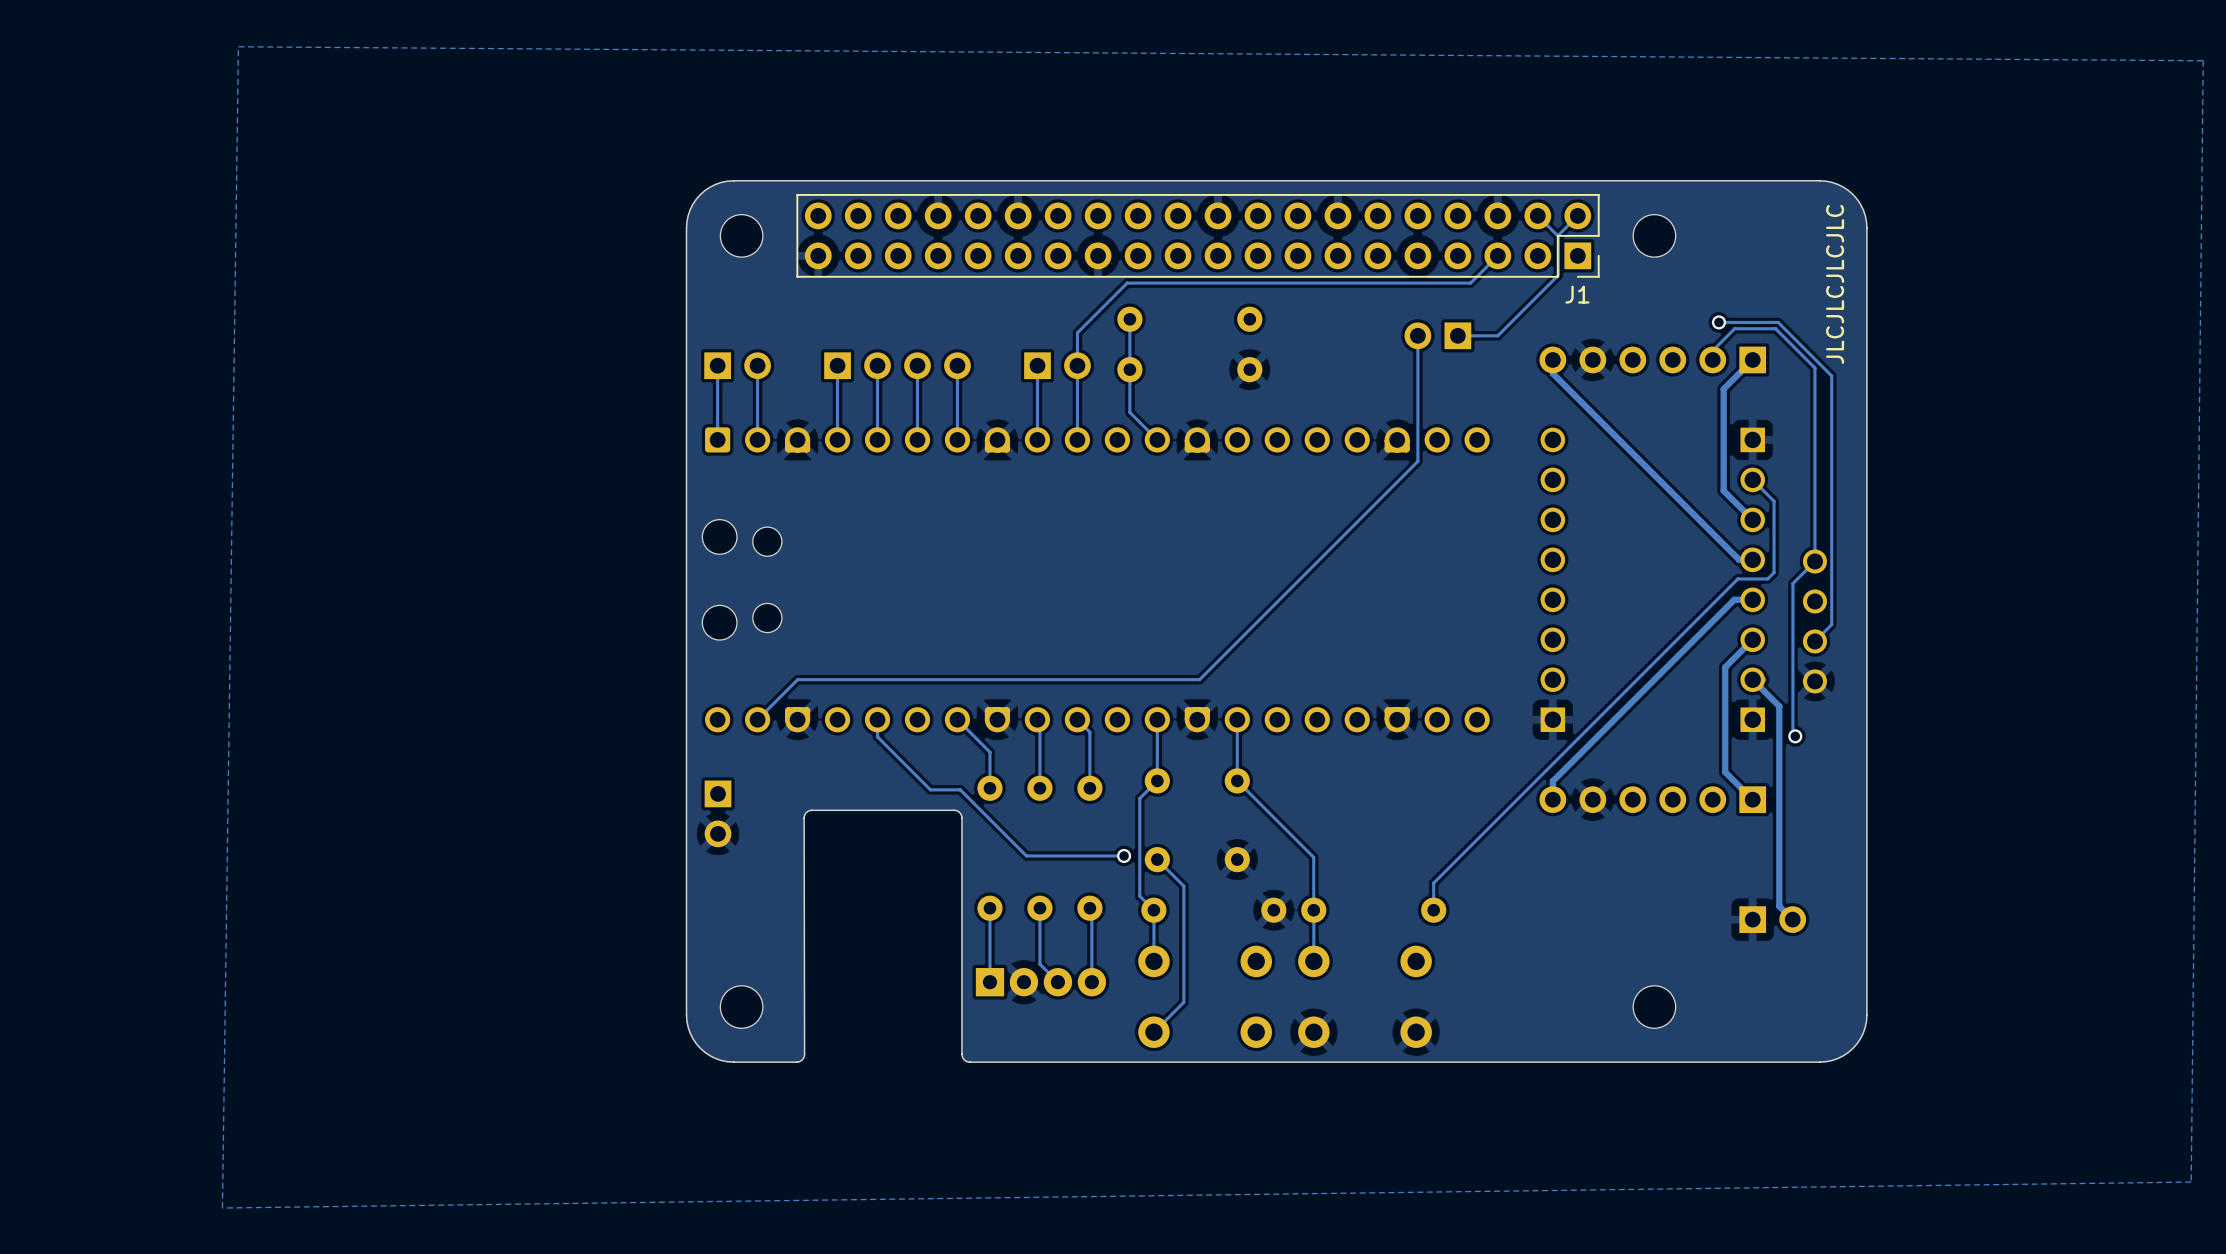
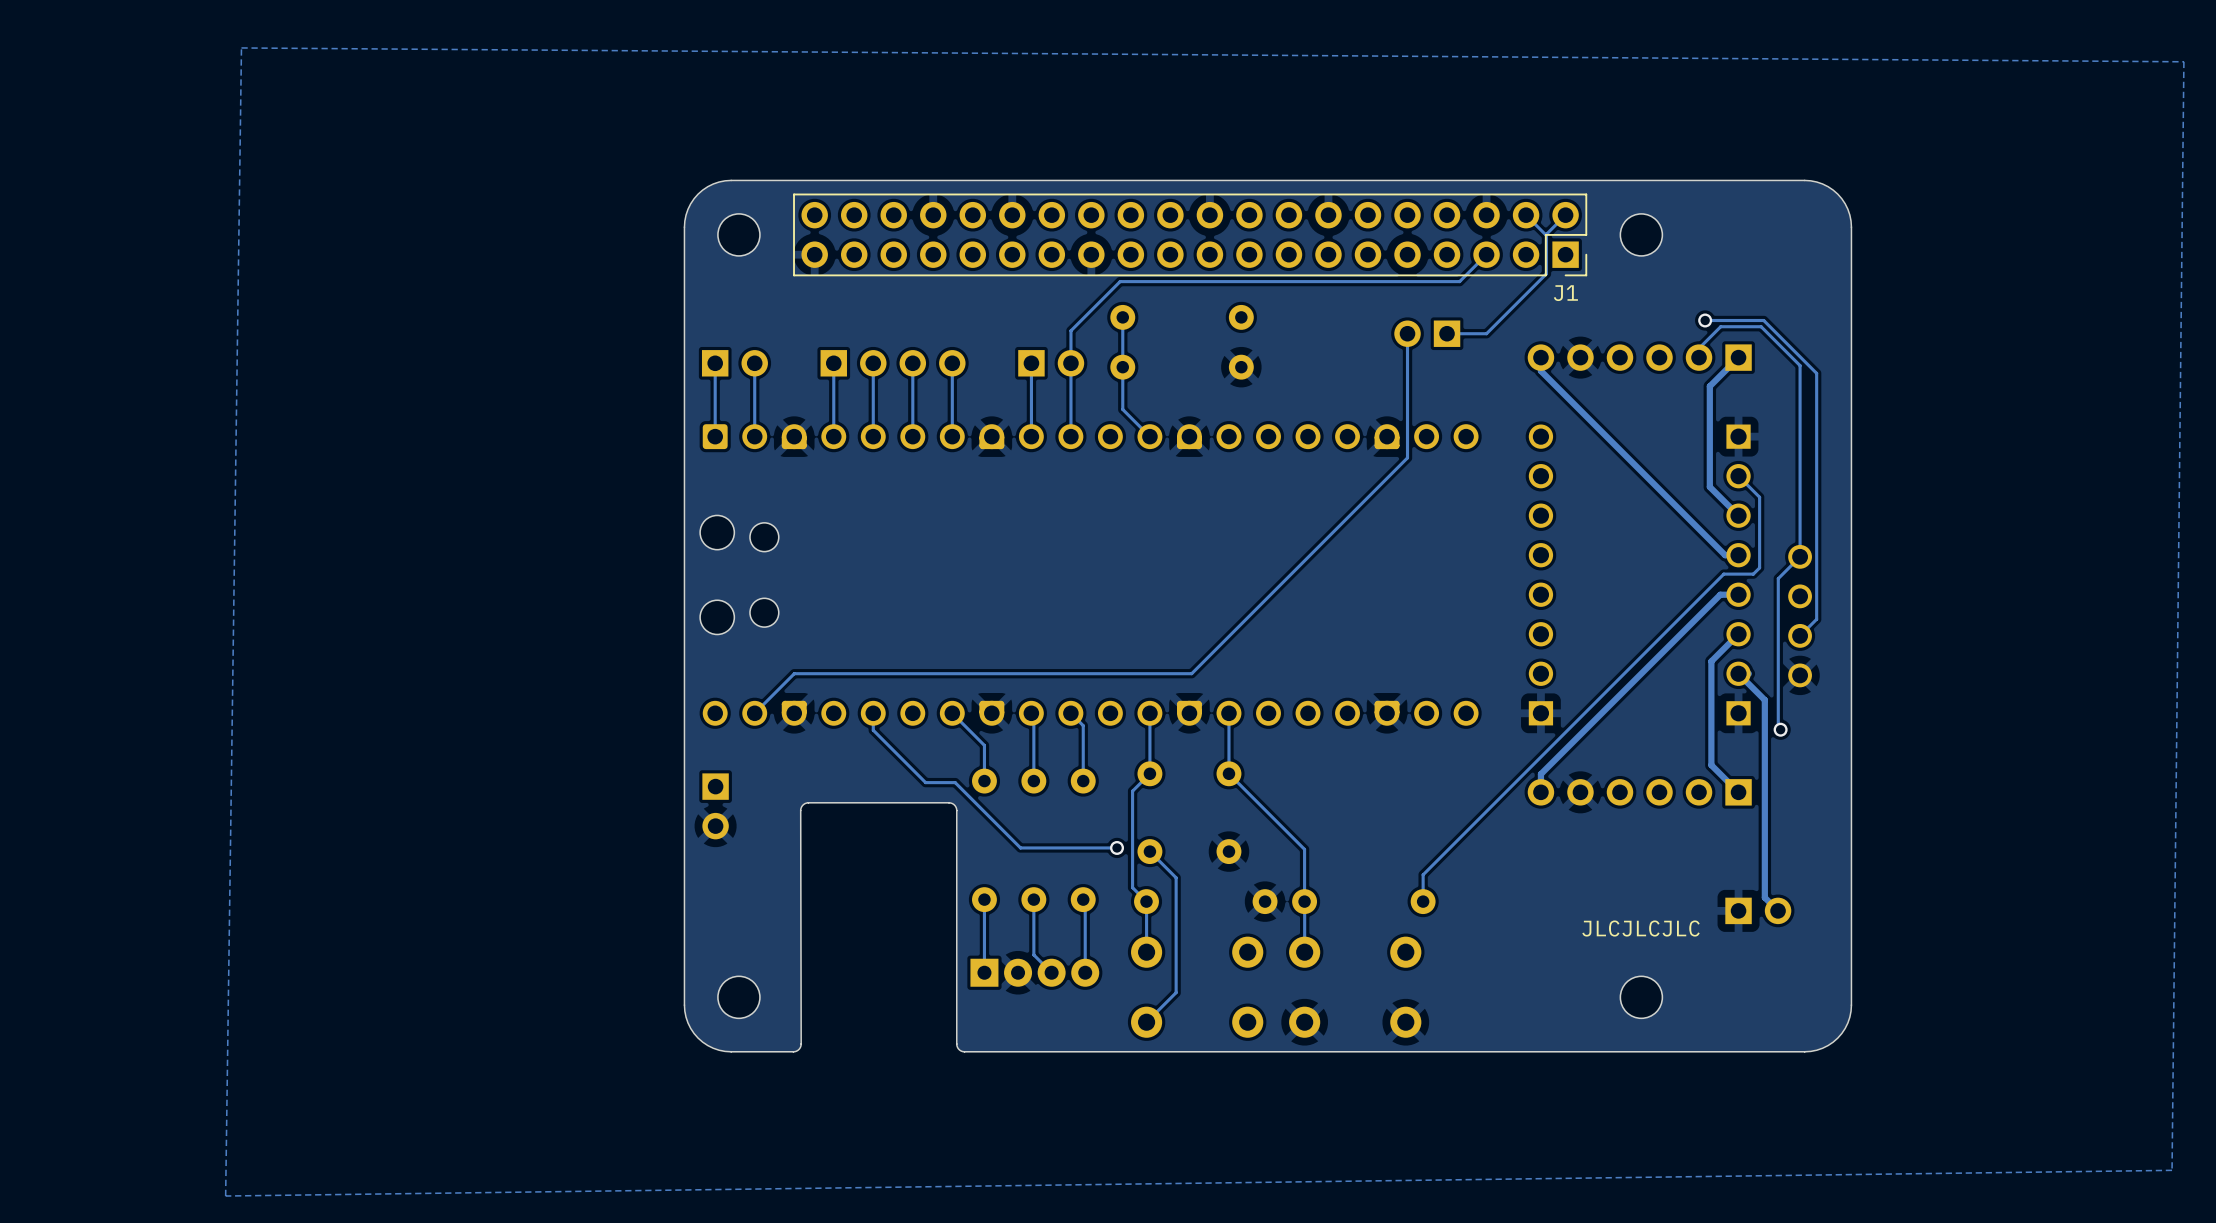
text: JLCJLCJLCJLC (1835, 284) -> none
text: none -> JLCJLCJLC (1641, 928)

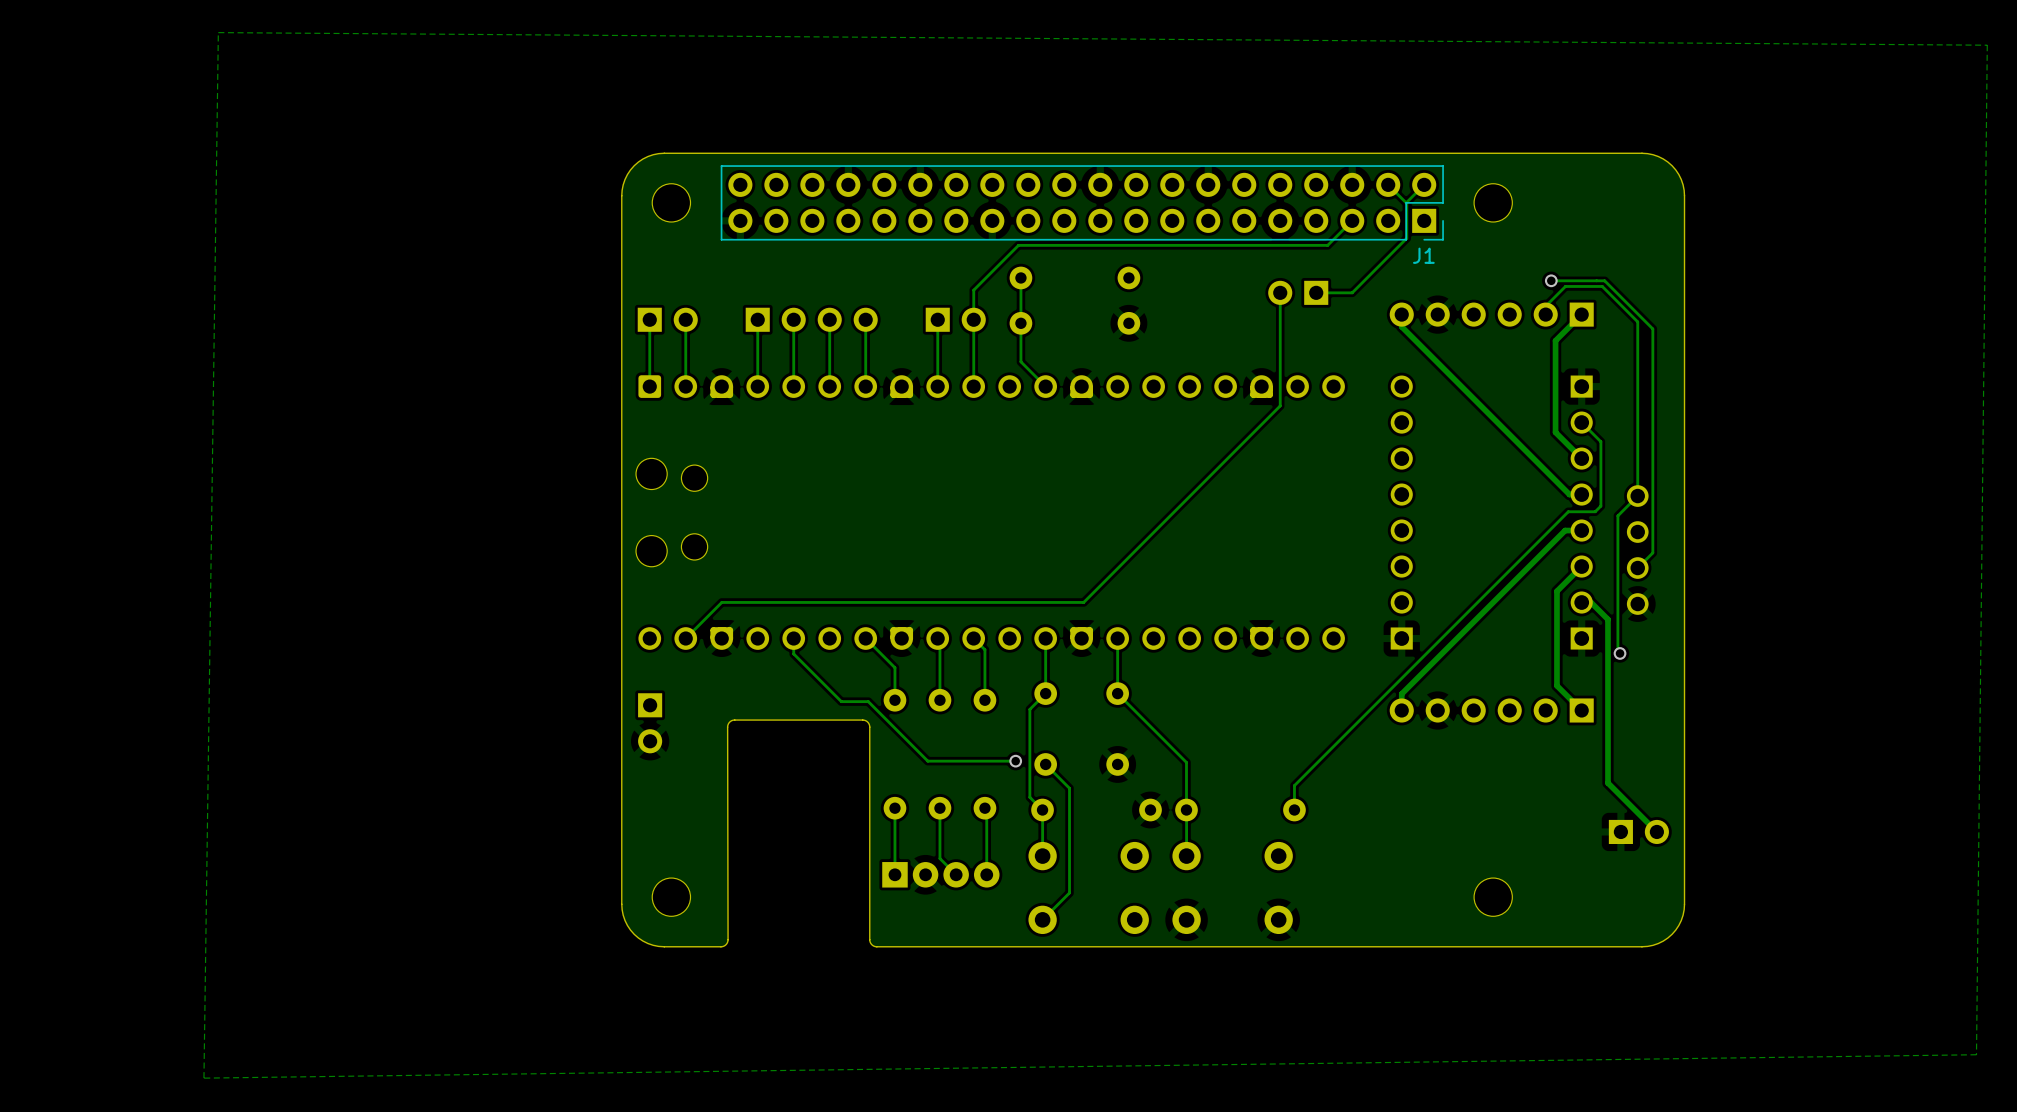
track: (1738, 673) (1764, 700) (1764, 897) (1778, 910) -> none
track: none -> (1591, 602) (1607, 619) (1607, 783) (1656, 831)
part position: (1758, 910) -> (1638, 831)
text: JLCJLCJLC (1641, 928) -> none

